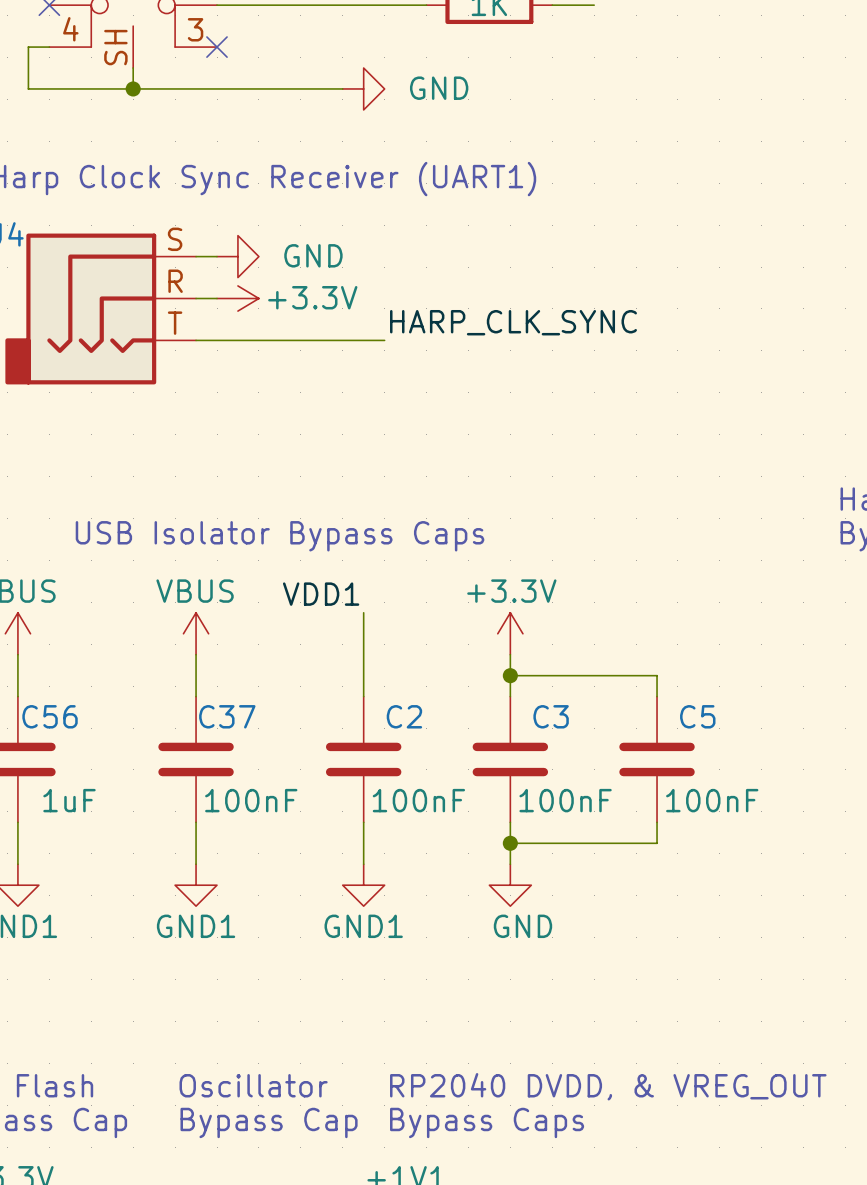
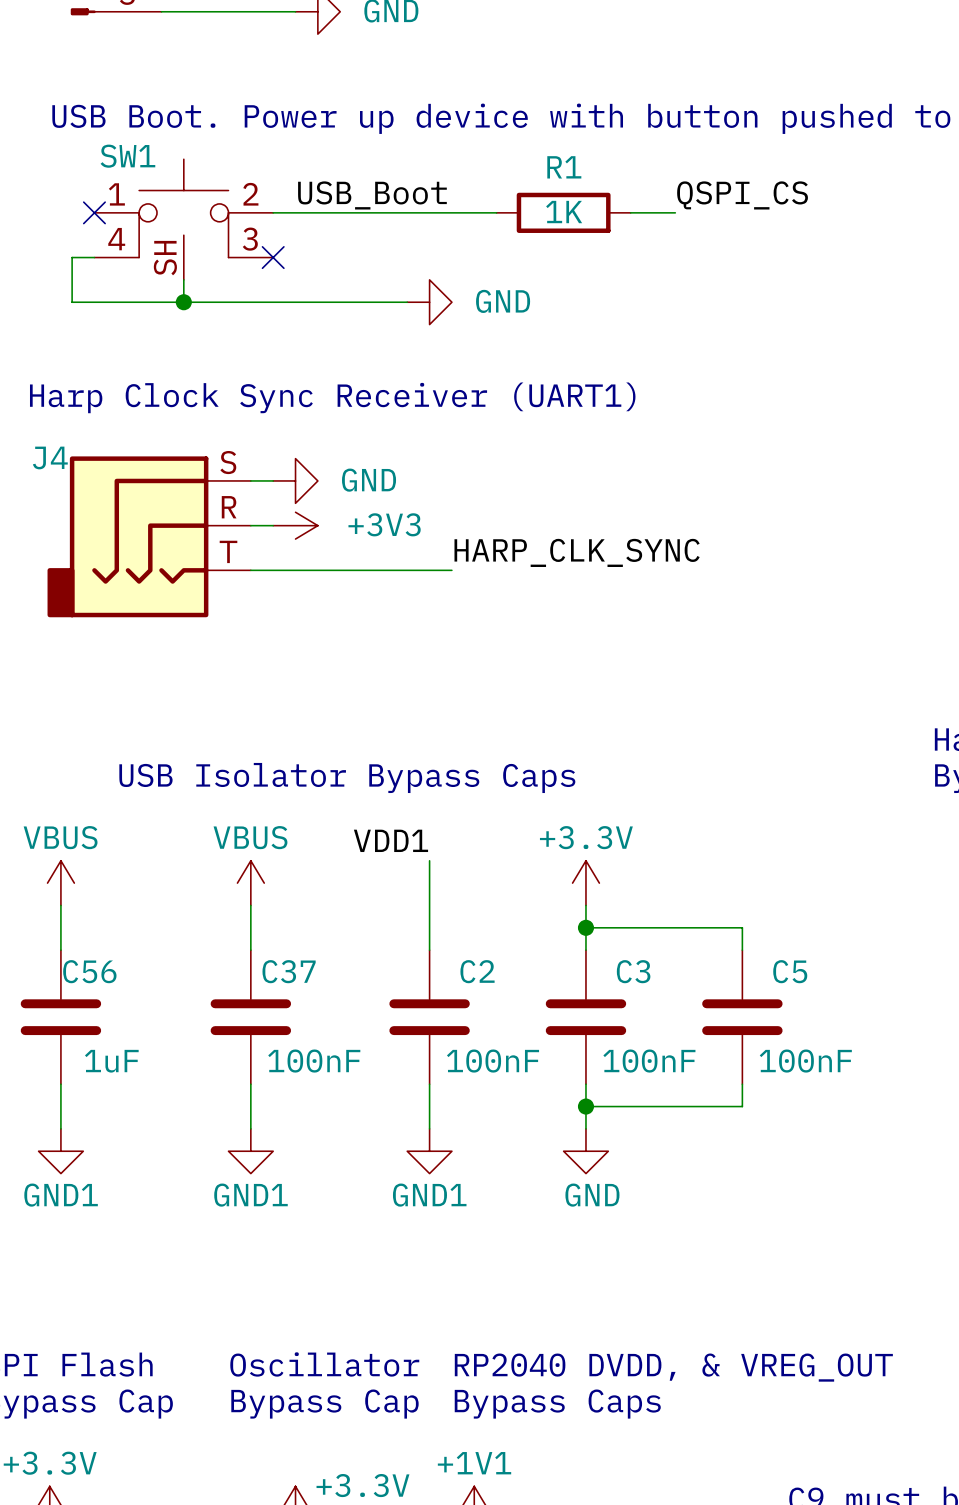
power symbol: +3.3V (237, 298) -> +3V3 (295, 525)

